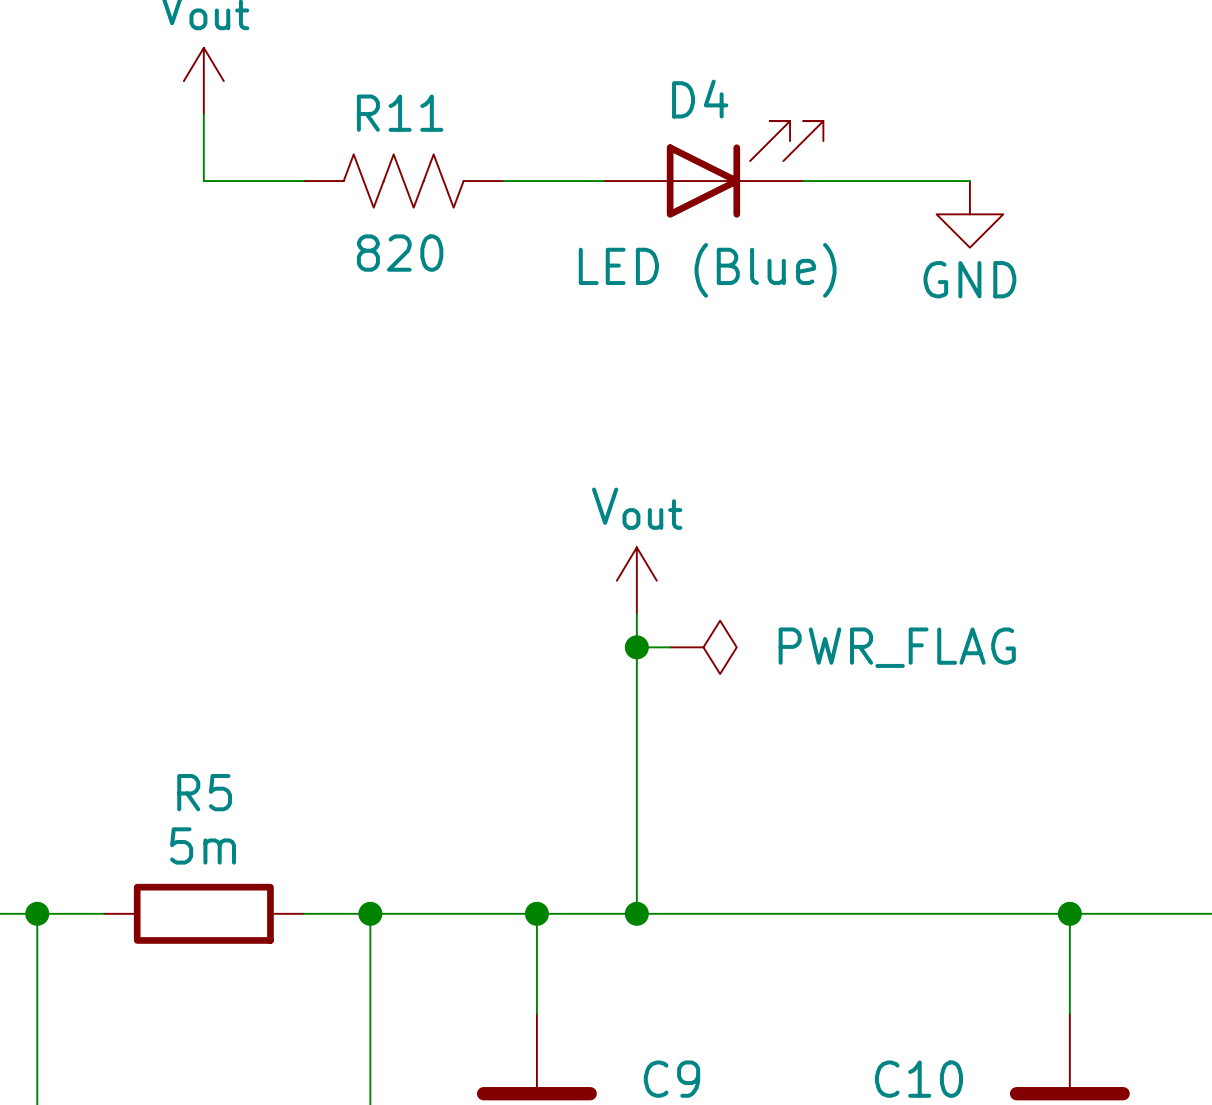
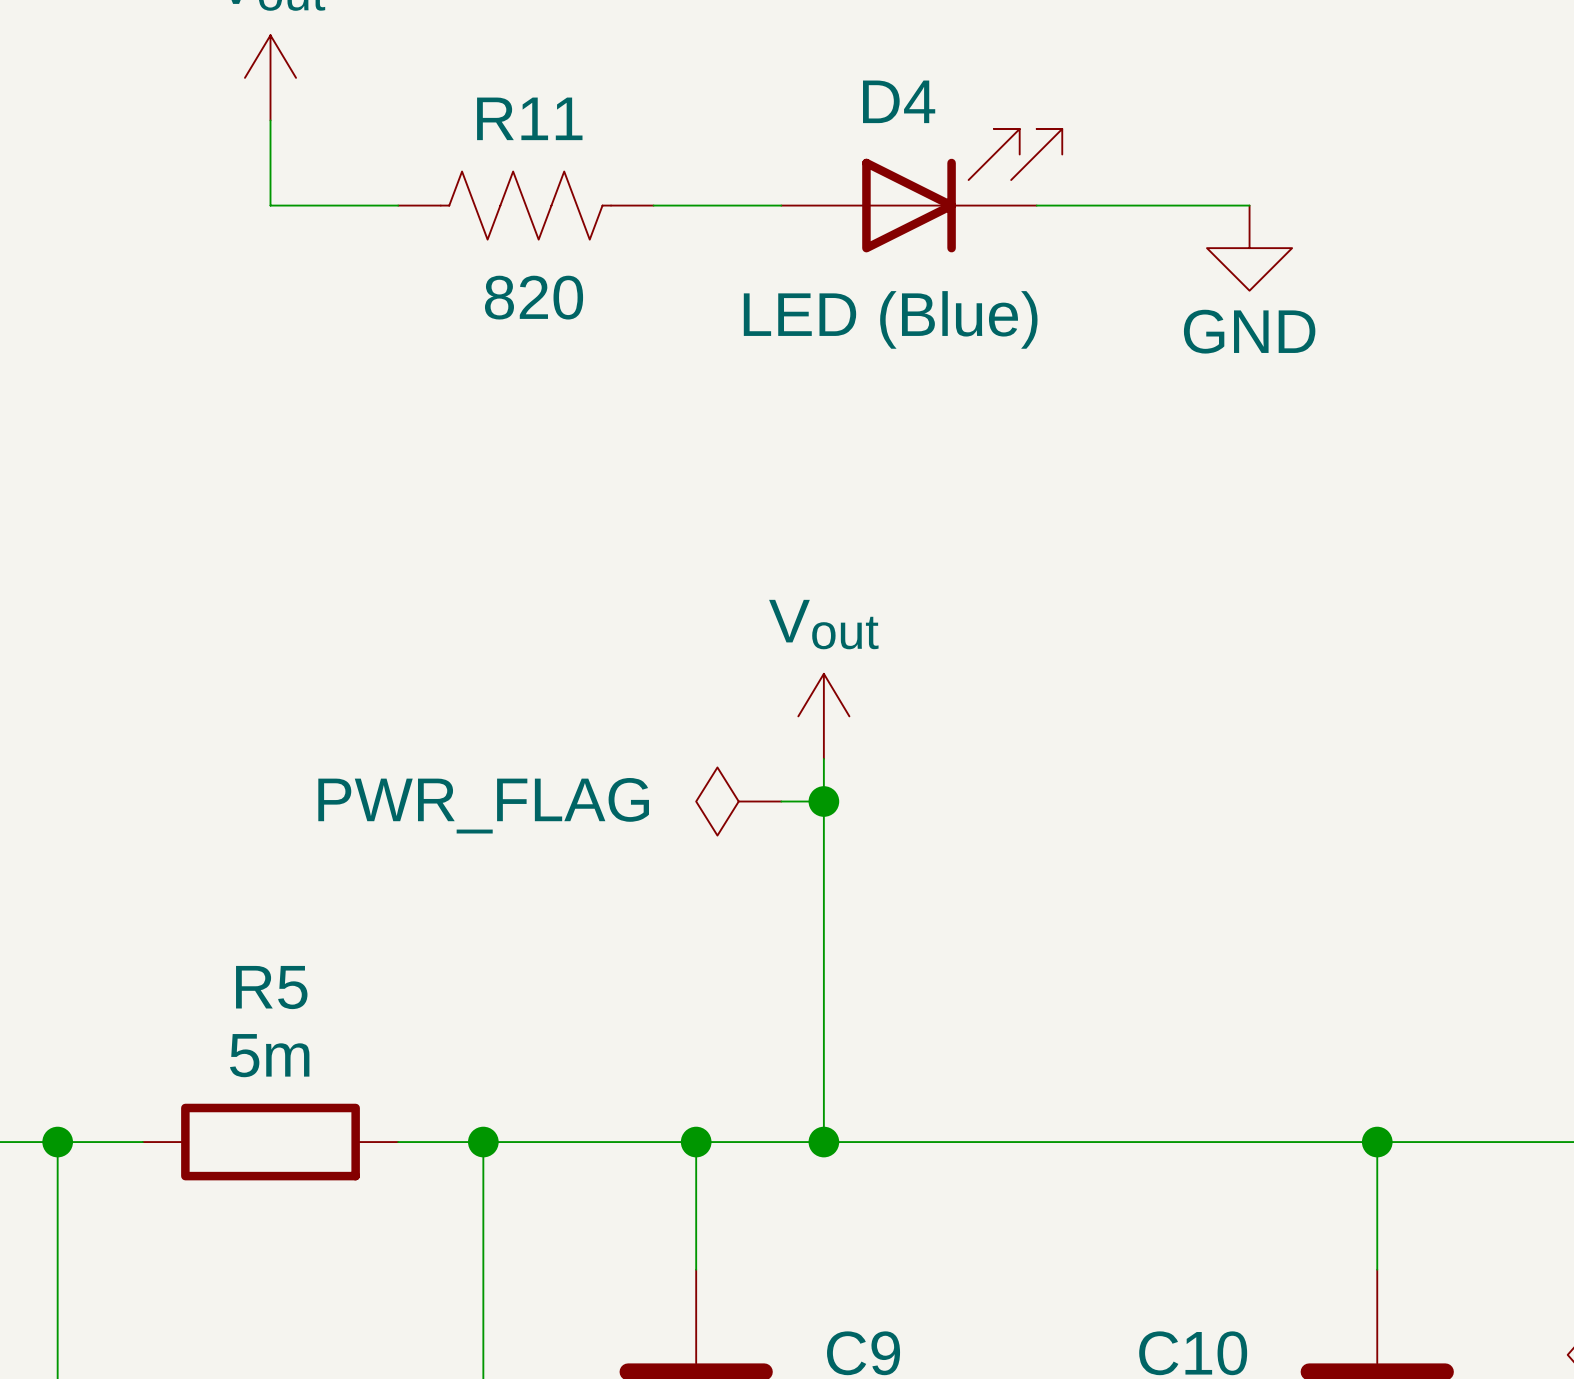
wire: (636, 647) (670, 647) -> (823, 801) (781, 801)
power symbol rotation: 0° (703, 647) -> 180° (738, 801)
power symbol position: PWR_FLAG (703, 647) -> PWR_FLAG (738, 801)

